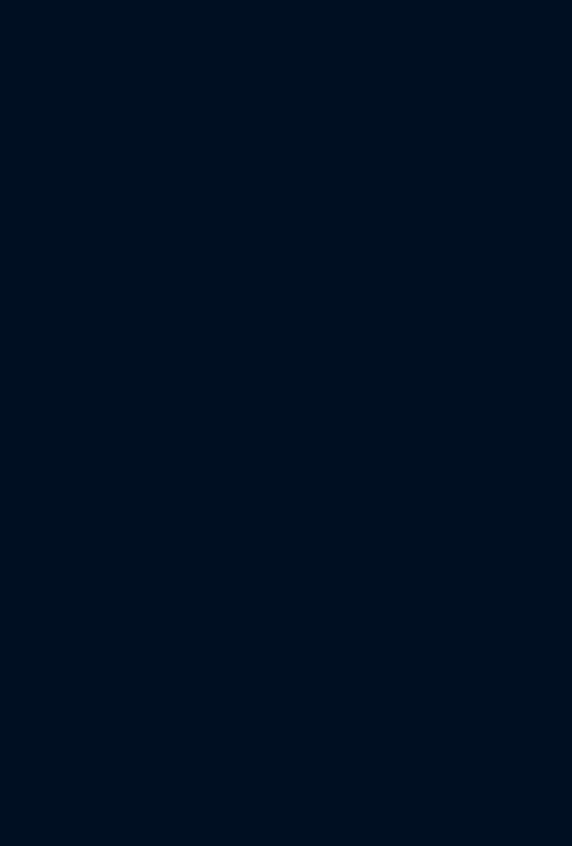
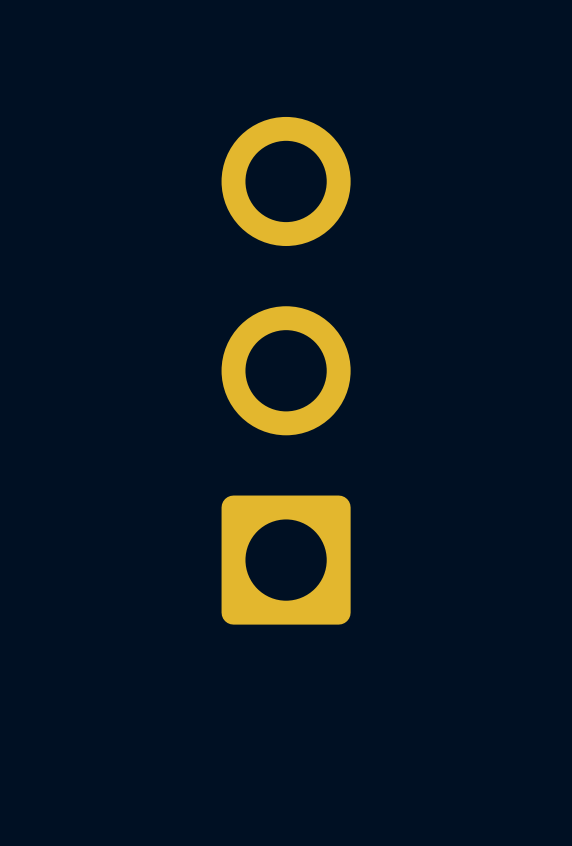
part: none -> (286, 370)

